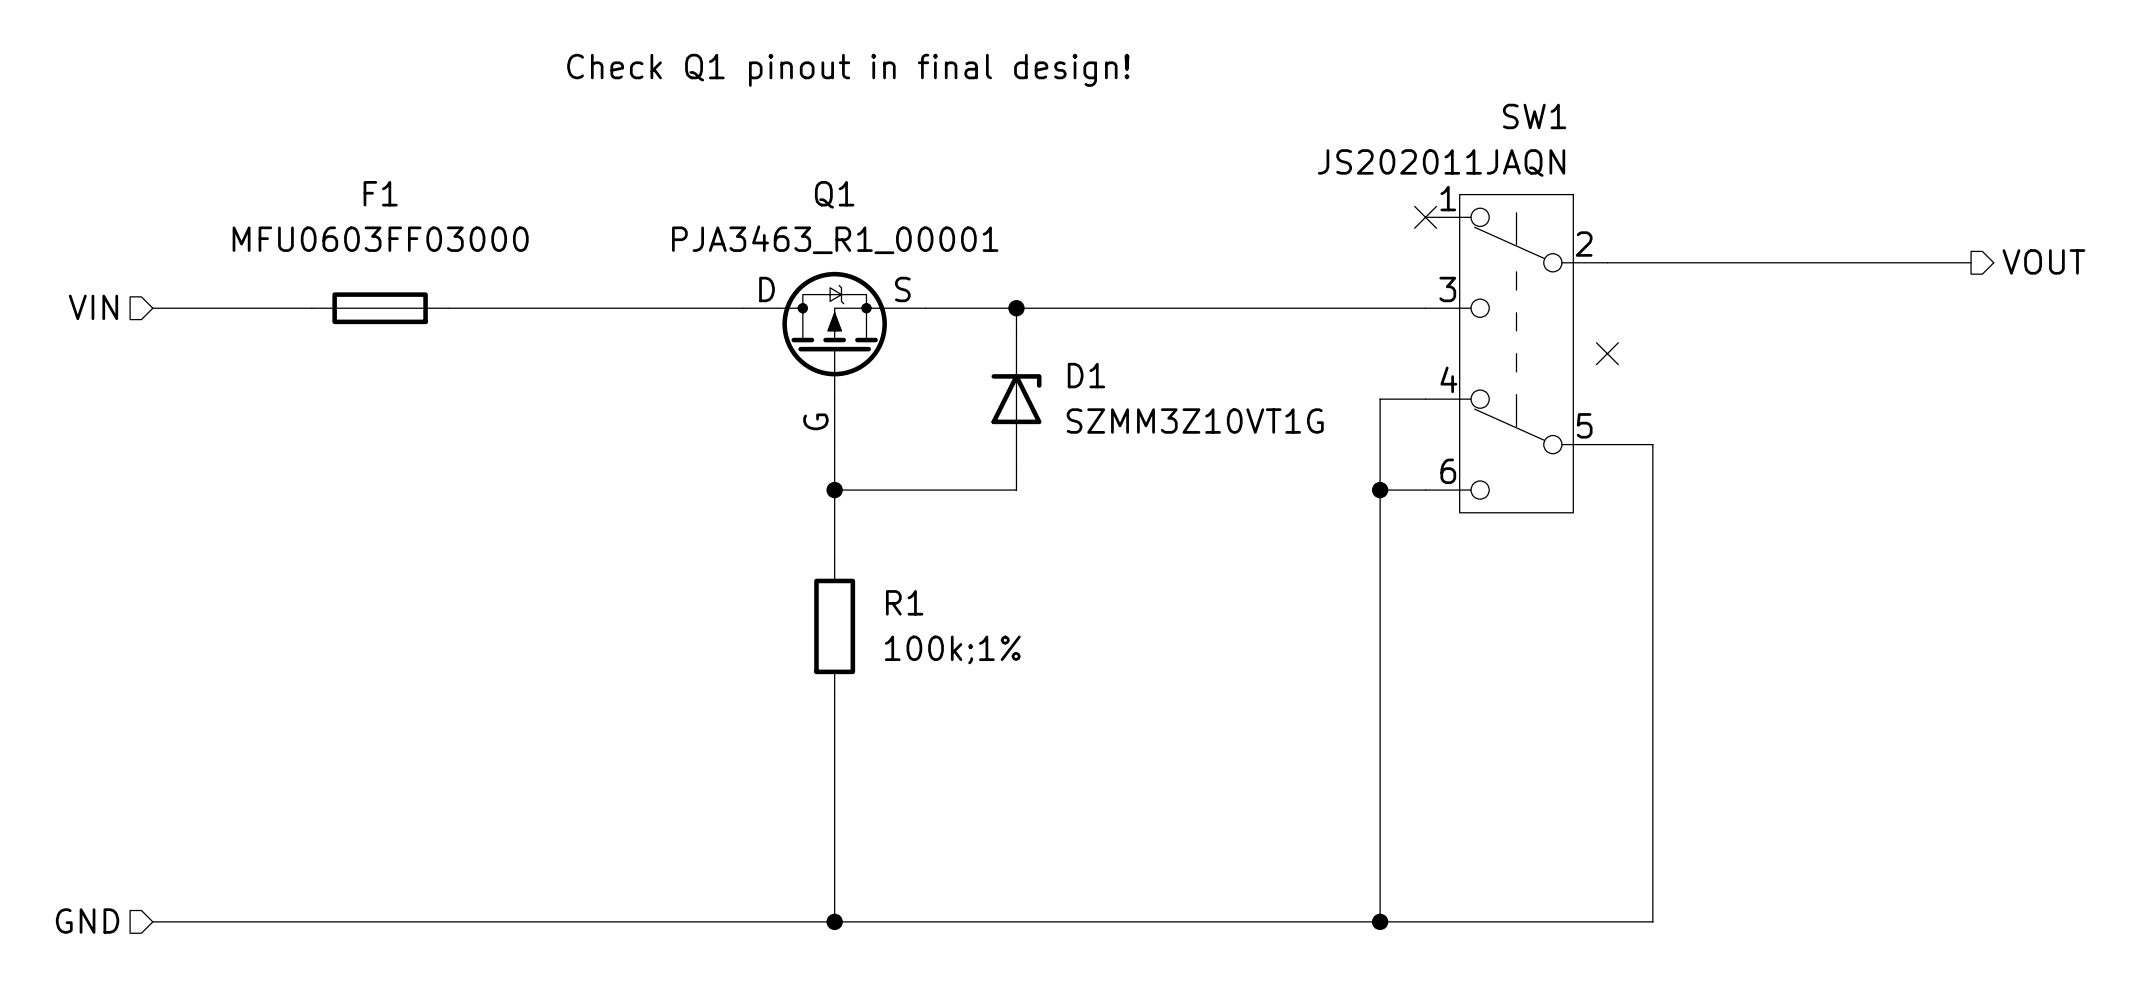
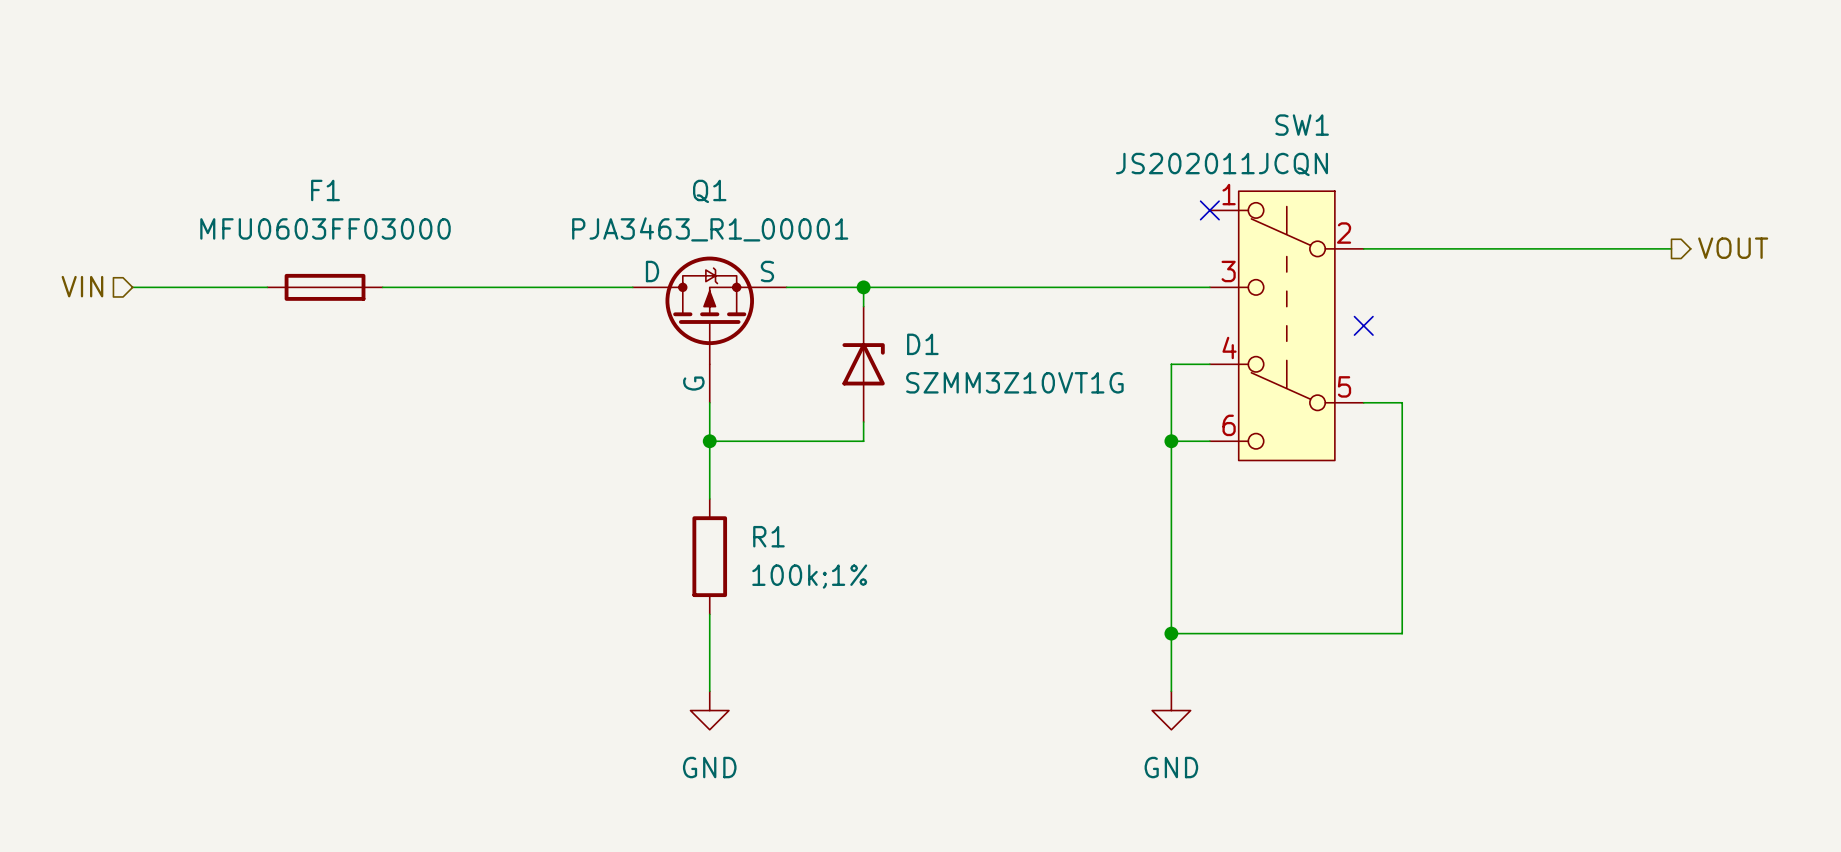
text: Check Q1 pinout in final design! (848, 70) -> none
SW1 value: JS202011JAQN (1441, 163) -> JS202011JCQN (1221, 164)
junction: none -> (1171, 633)
wire: (1652, 717) (1652, 921) (152, 921) -> (1402, 633) (1171, 633)
wire: (834, 785) (834, 921) -> none
wire: (1380, 785) (1380, 921) -> none
power symbol: none -> GND (709, 710)
power symbol: none -> GND (1171, 710)
hierarchical label: GND (87, 921) -> none
junction: (834, 921) -> none
junction: (1380, 921) -> none

